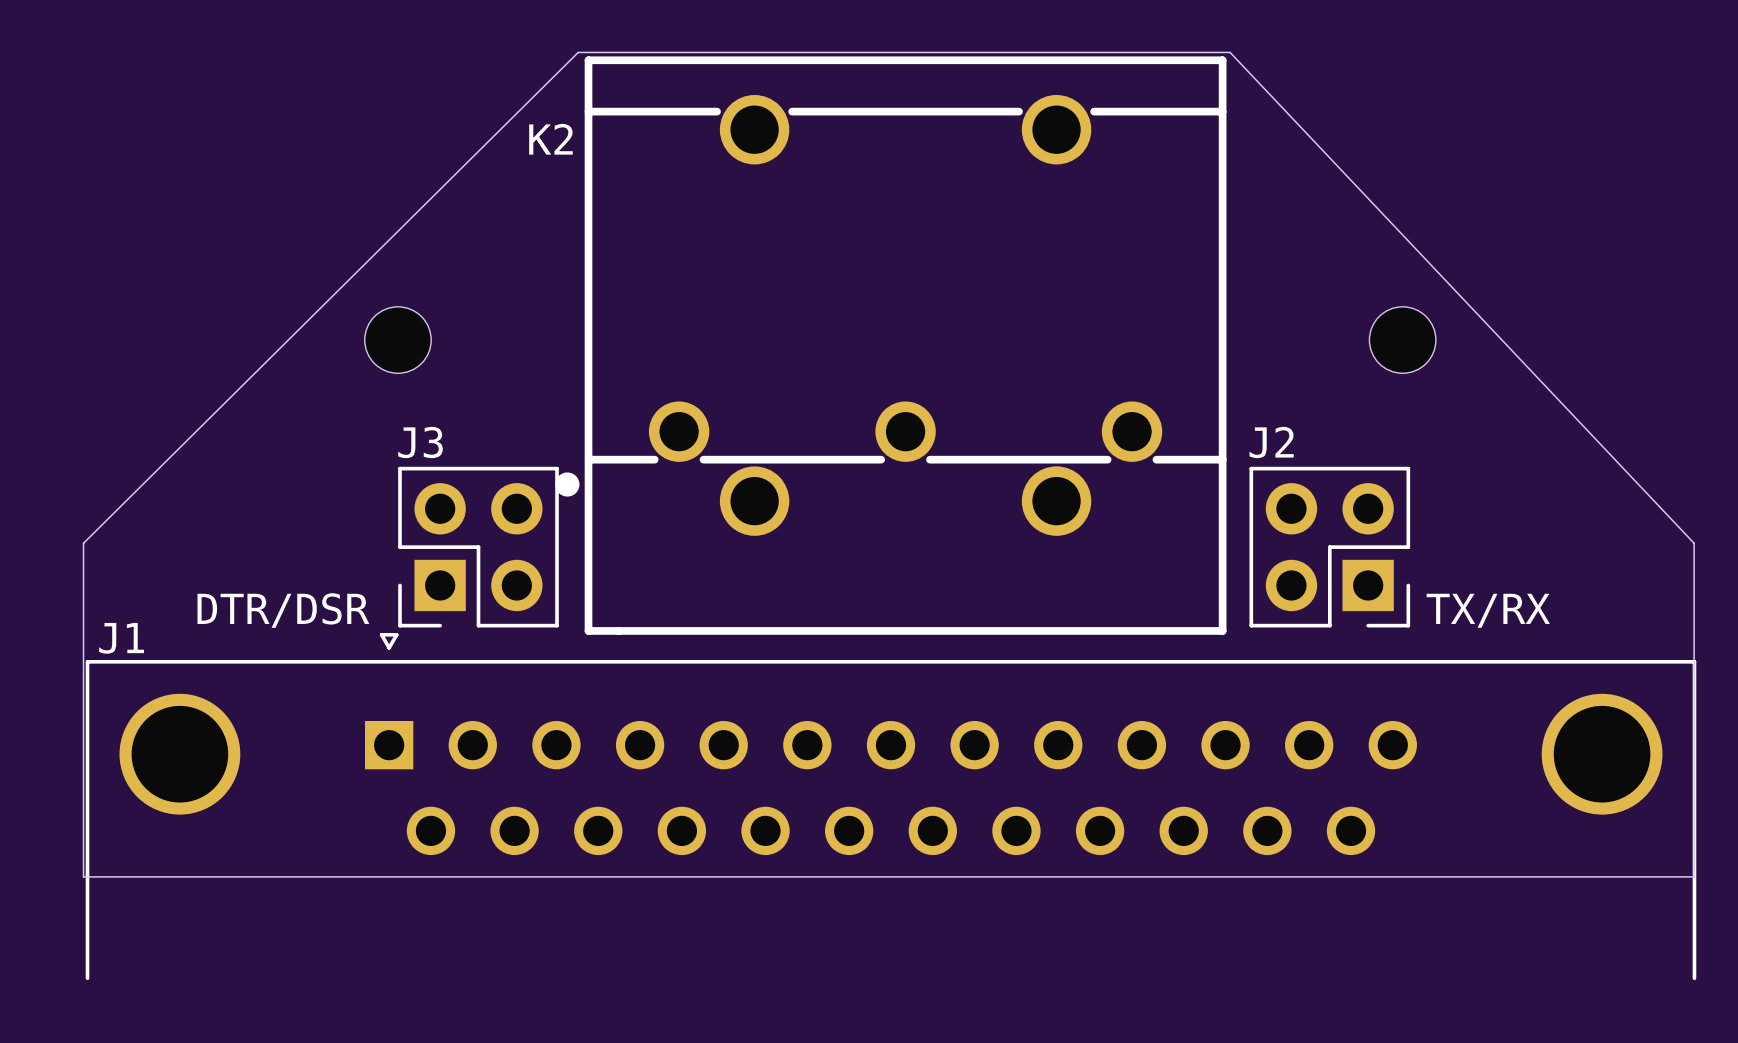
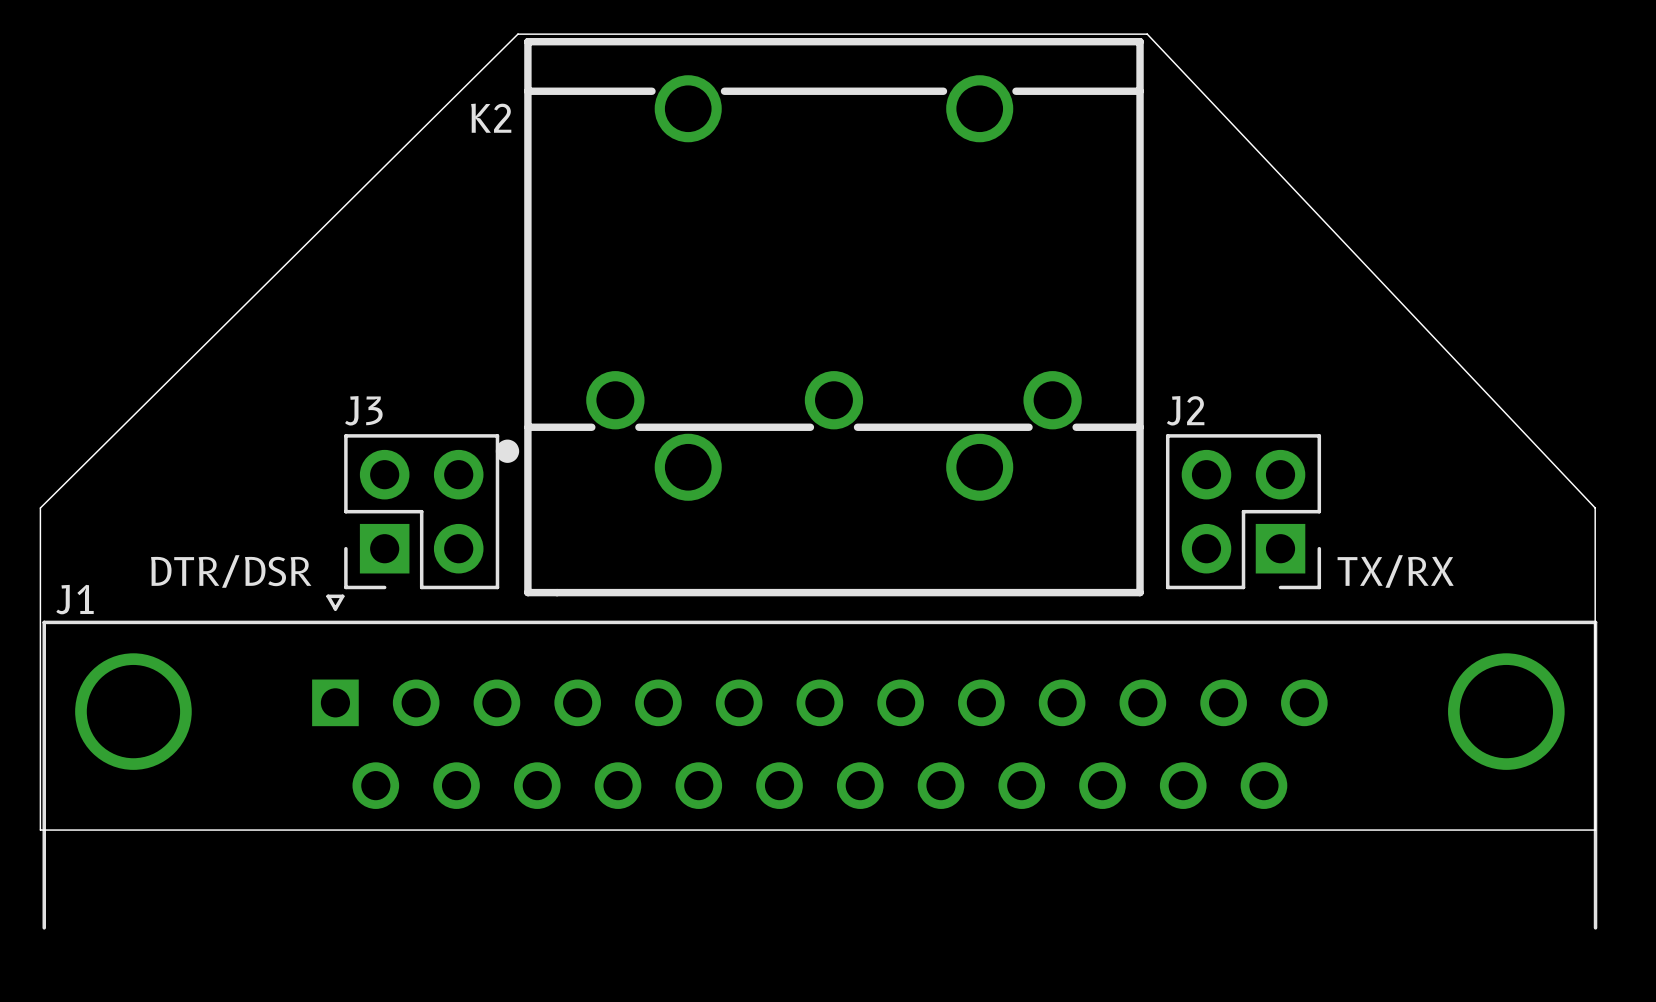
part: (397, 340) -> none
part: (1402, 340) -> none

